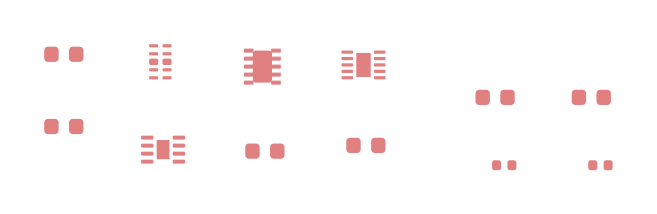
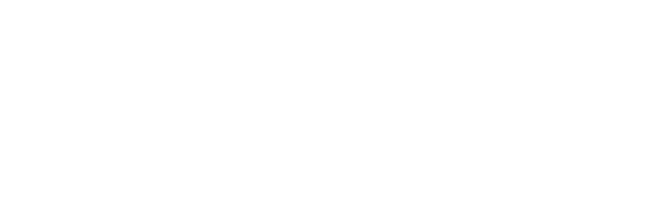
part: (63, 54) -> none
part: (160, 61) -> none
part: (363, 64) -> none
part: (262, 66) -> none
part: (495, 97) -> none
part: (591, 97) -> none
part: (63, 126) -> none
part: (365, 145) -> none
part: (163, 149) -> none
part: (264, 151) -> none
part: (504, 165) -> none
part: (600, 165) -> none

